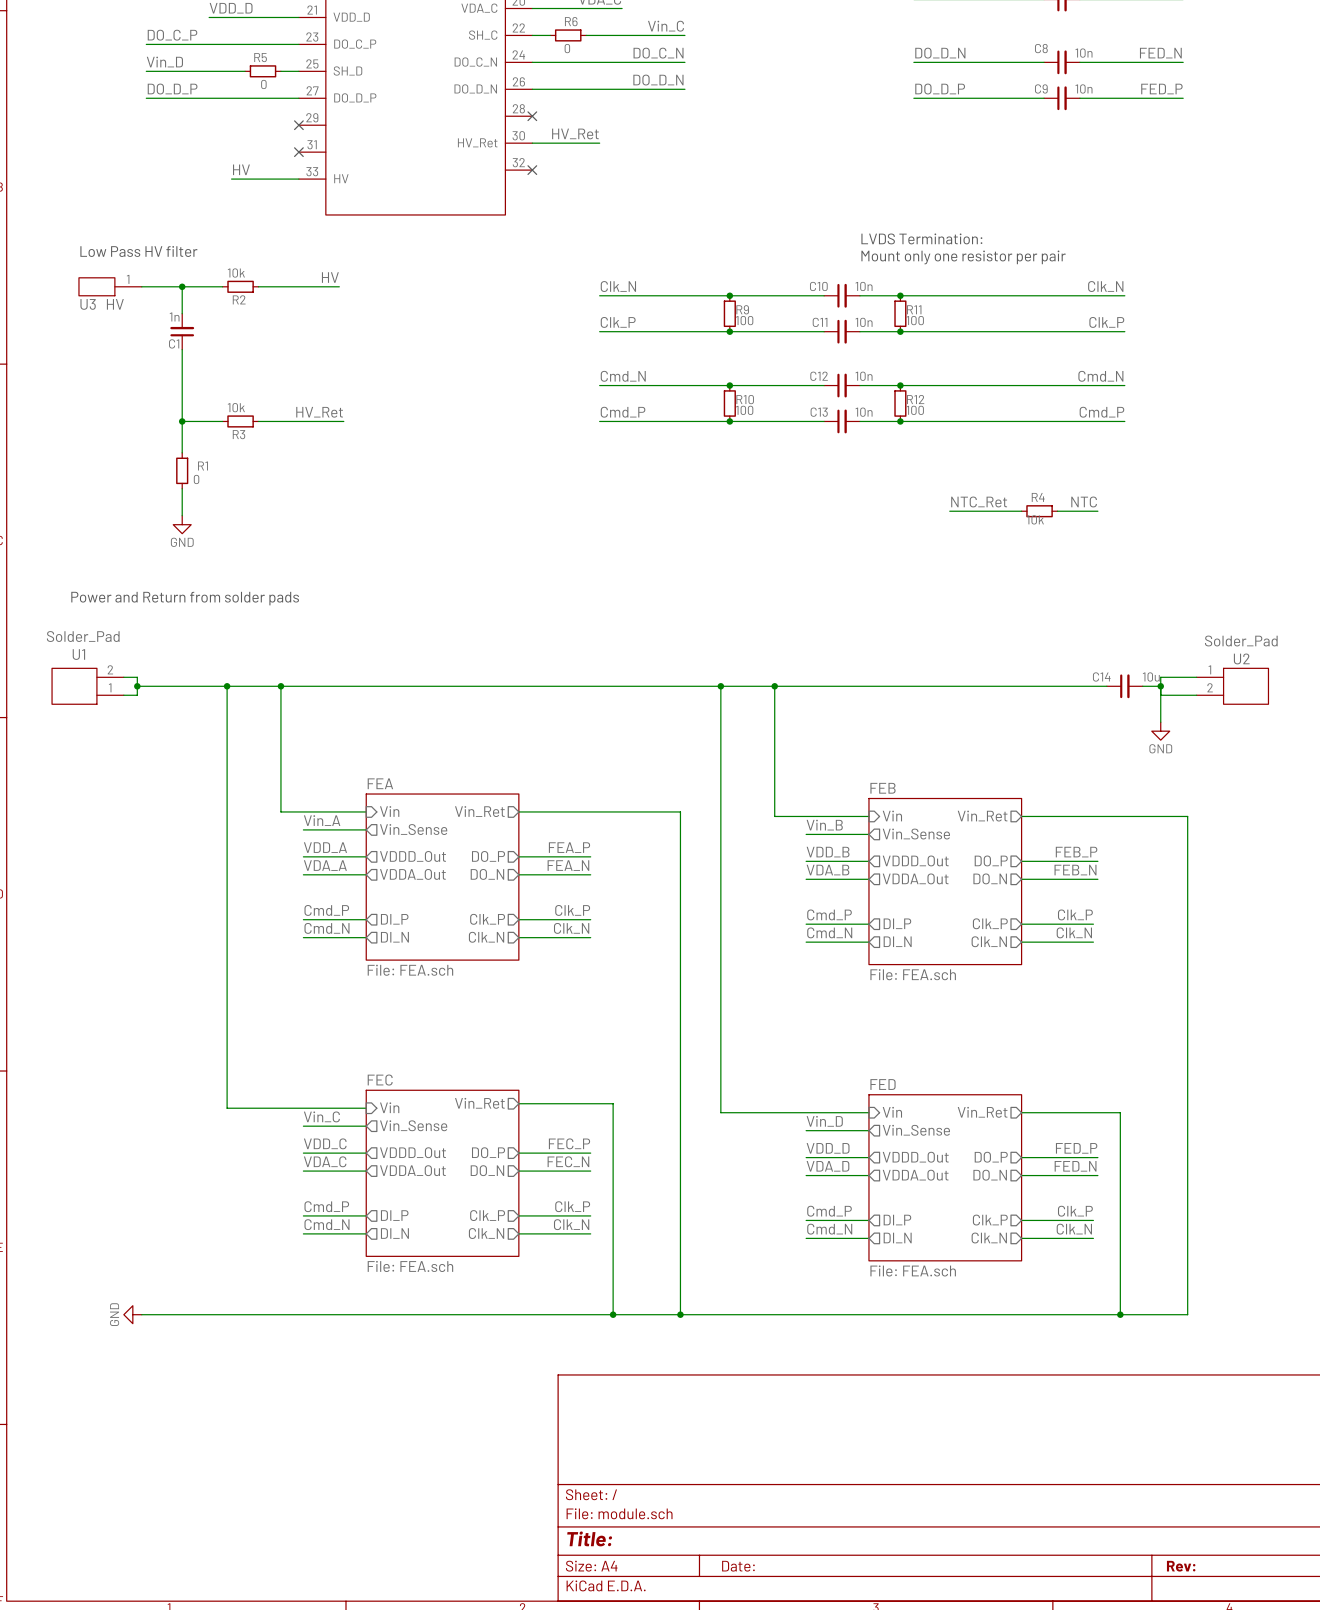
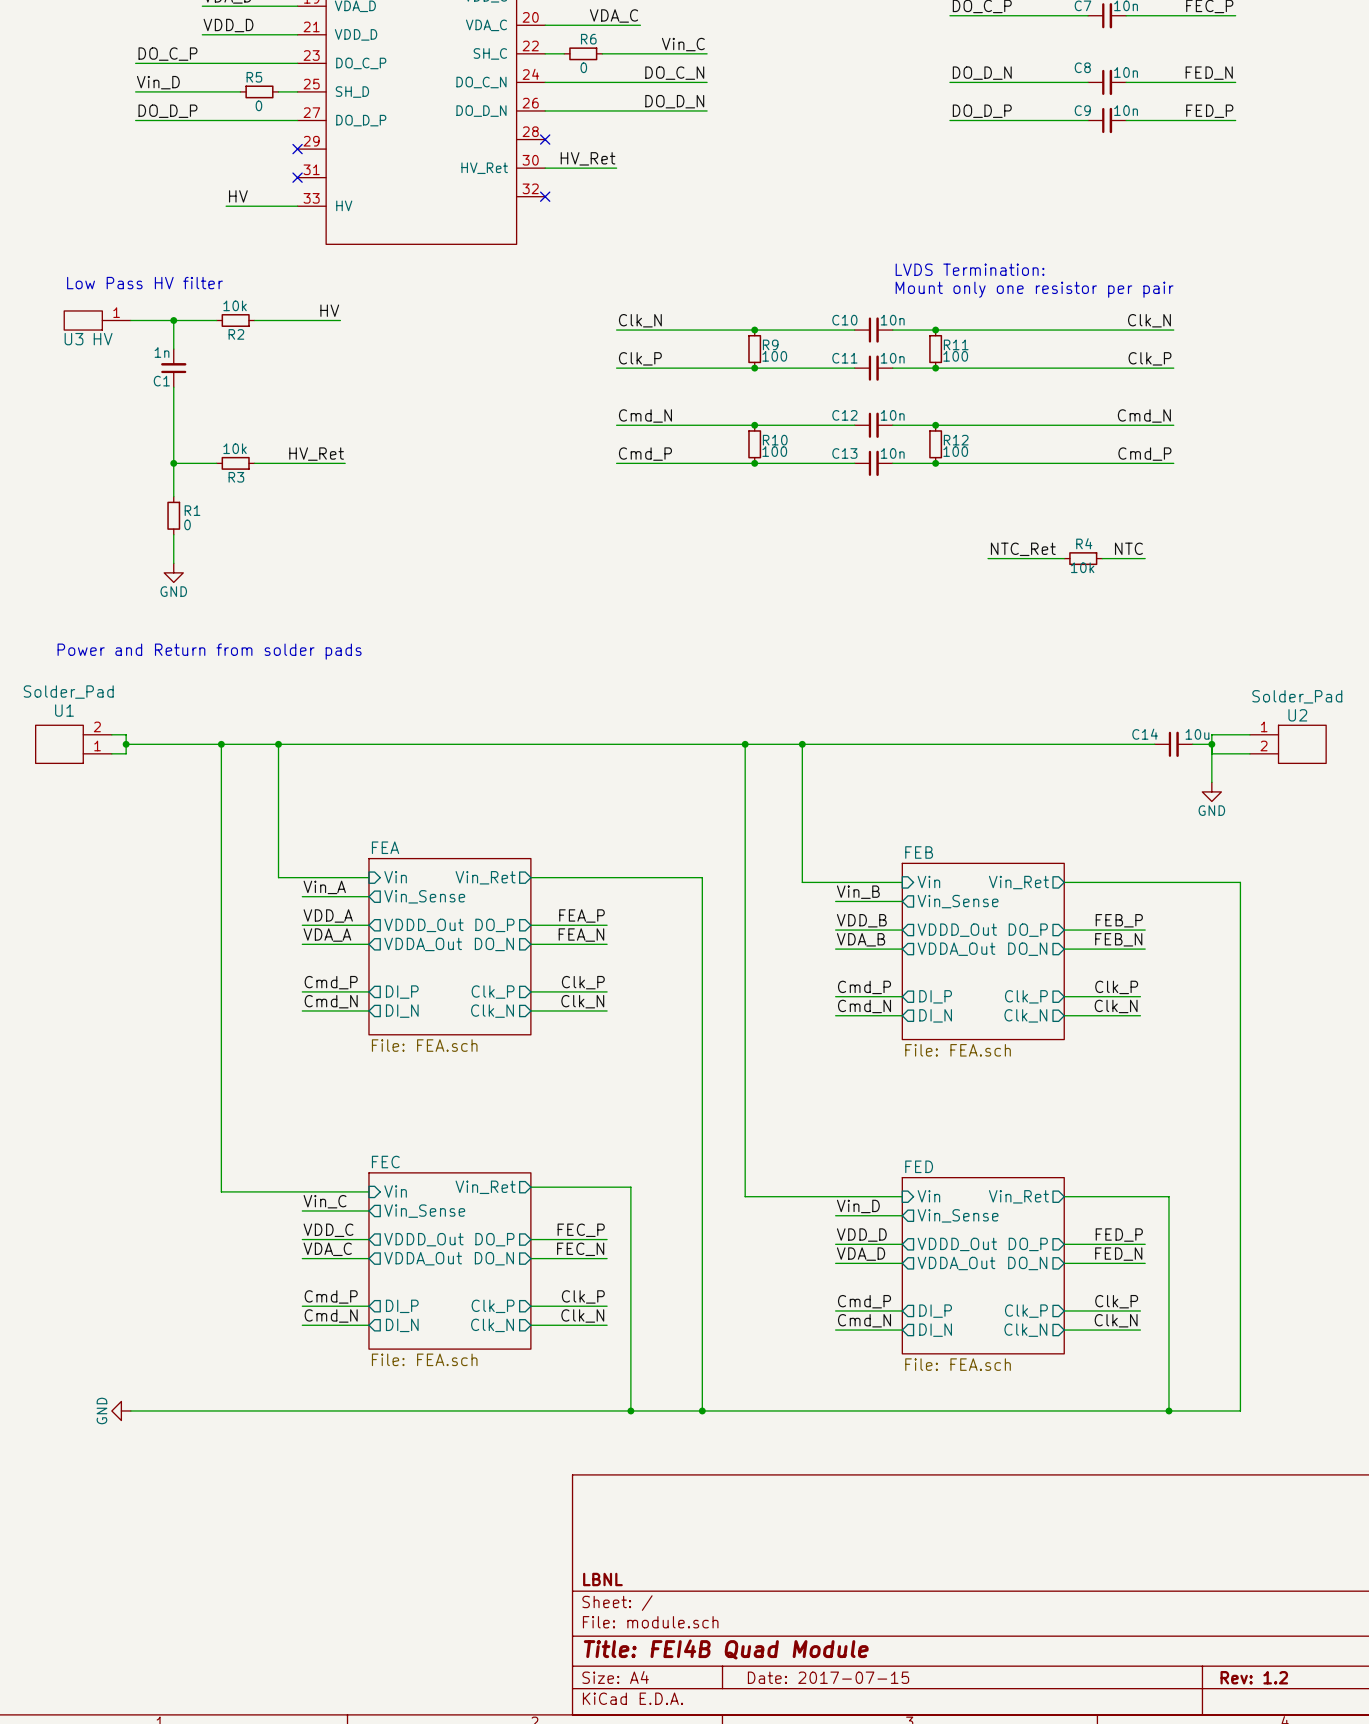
title block: none -> LBNL (602, 1579)
title block: Title: (589, 1538) -> Title: FEI4B Quad Module (726, 1649)
title block: Date: (738, 1566) -> Date: 2017-07-15 (828, 1677)
title block: Rev: (1181, 1566) -> Rev: 1.2 (1254, 1677)

